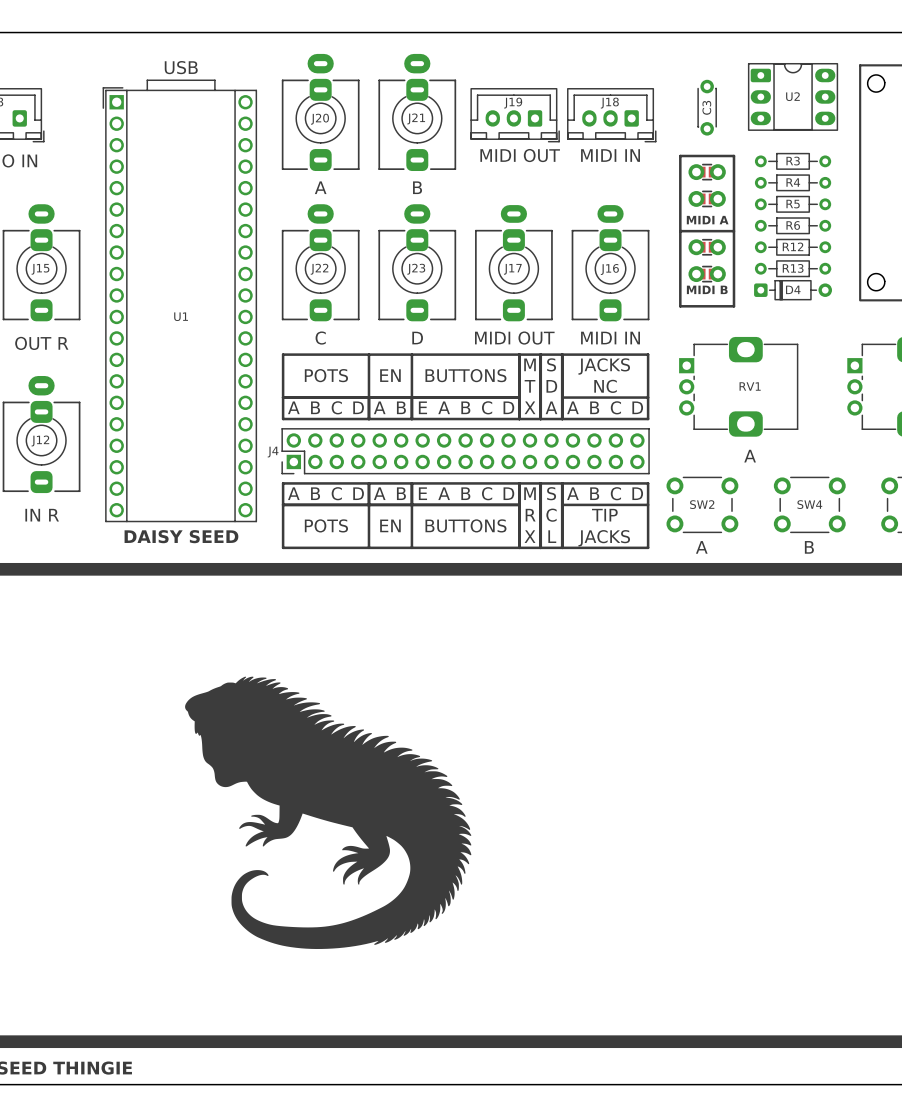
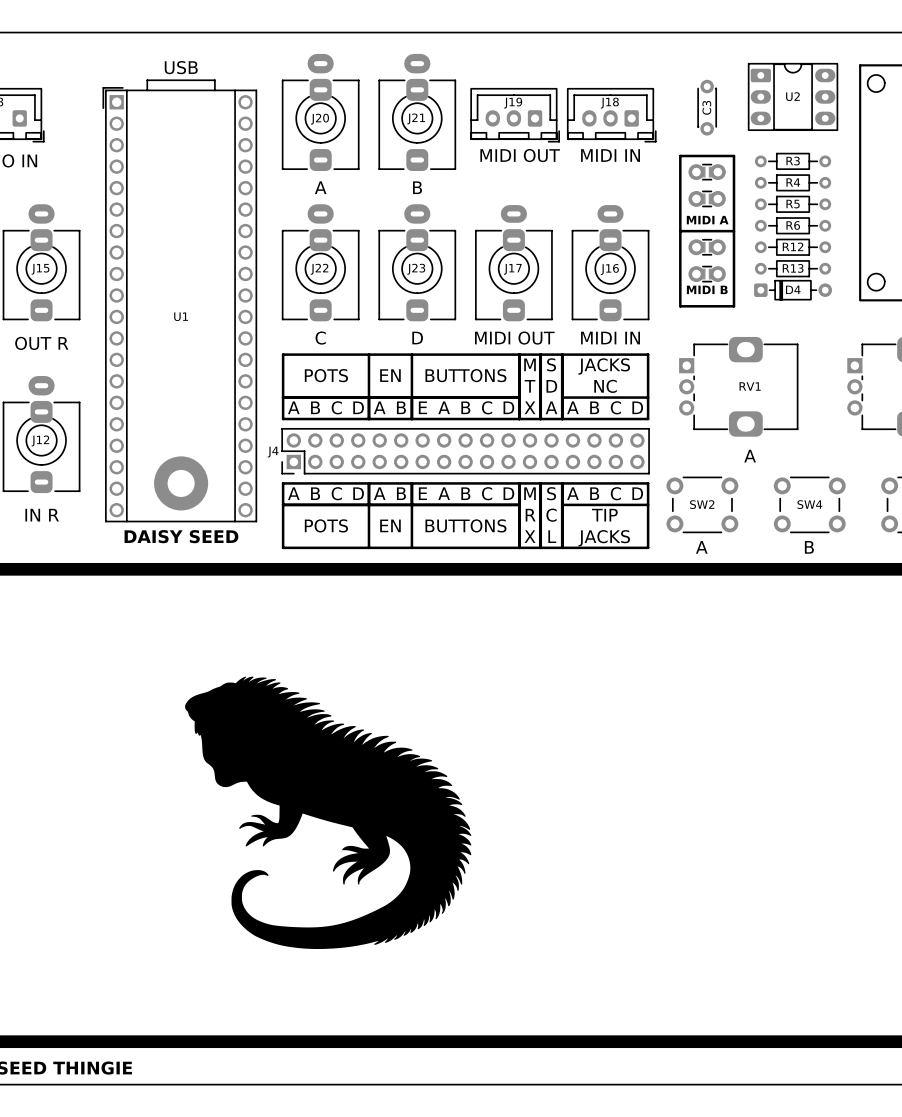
part: none -> (181, 483)

